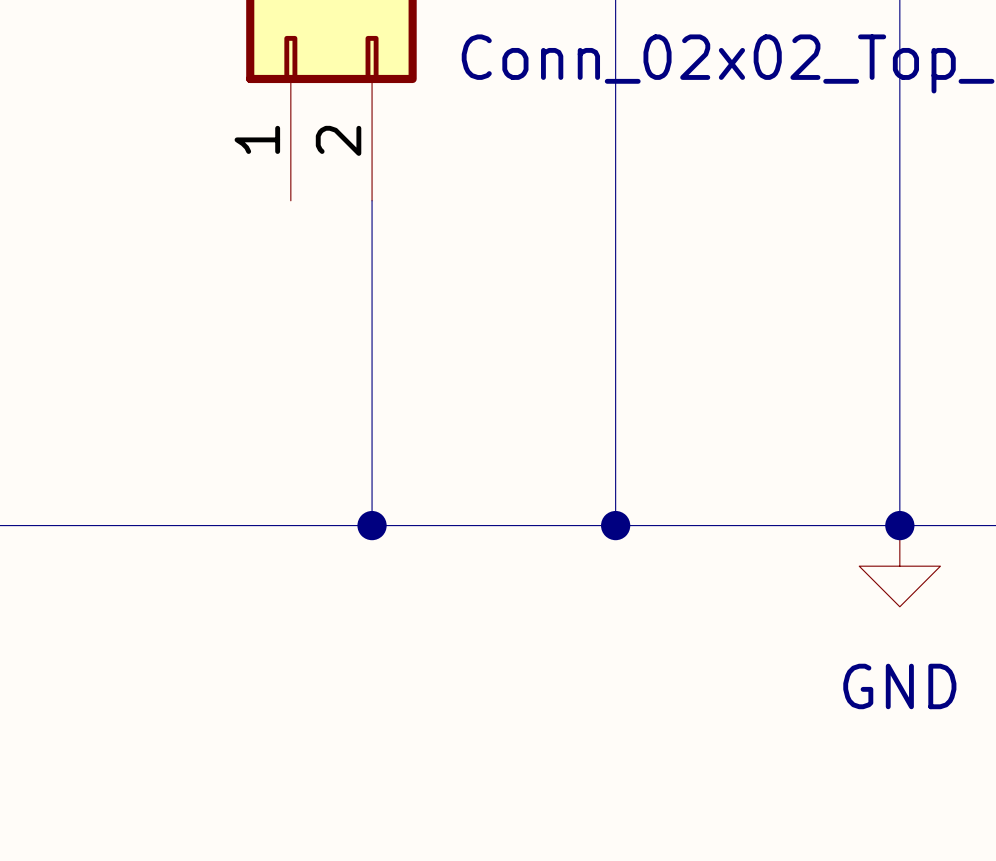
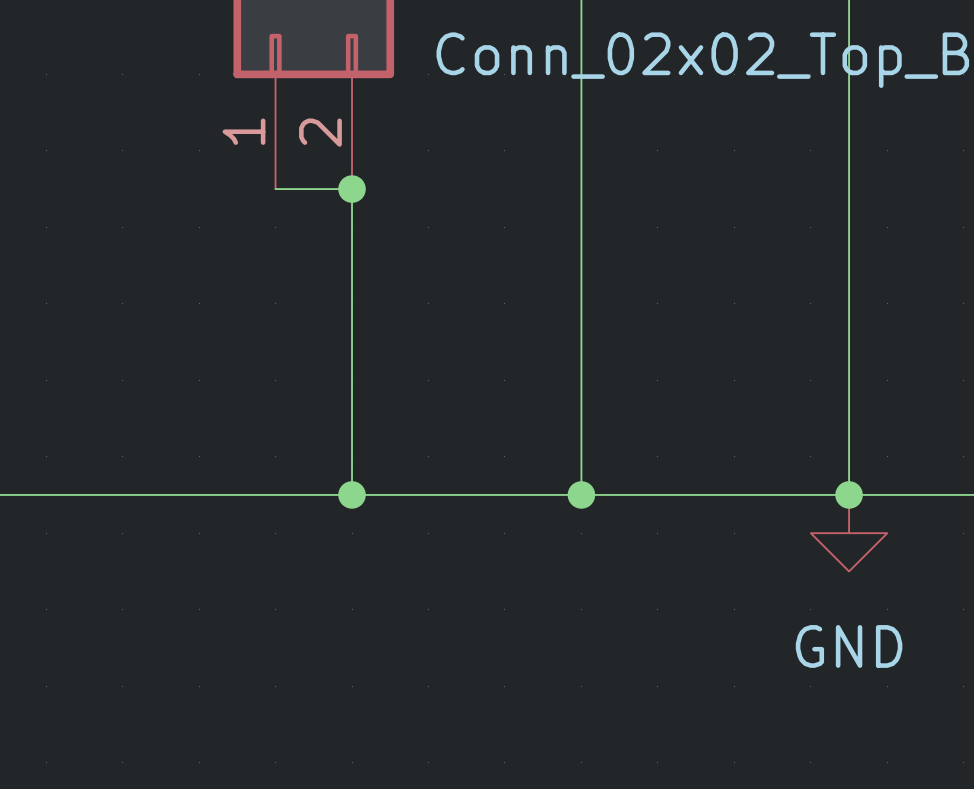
wire: none -> (275, 189) (352, 189)
junction: none -> (352, 189)

